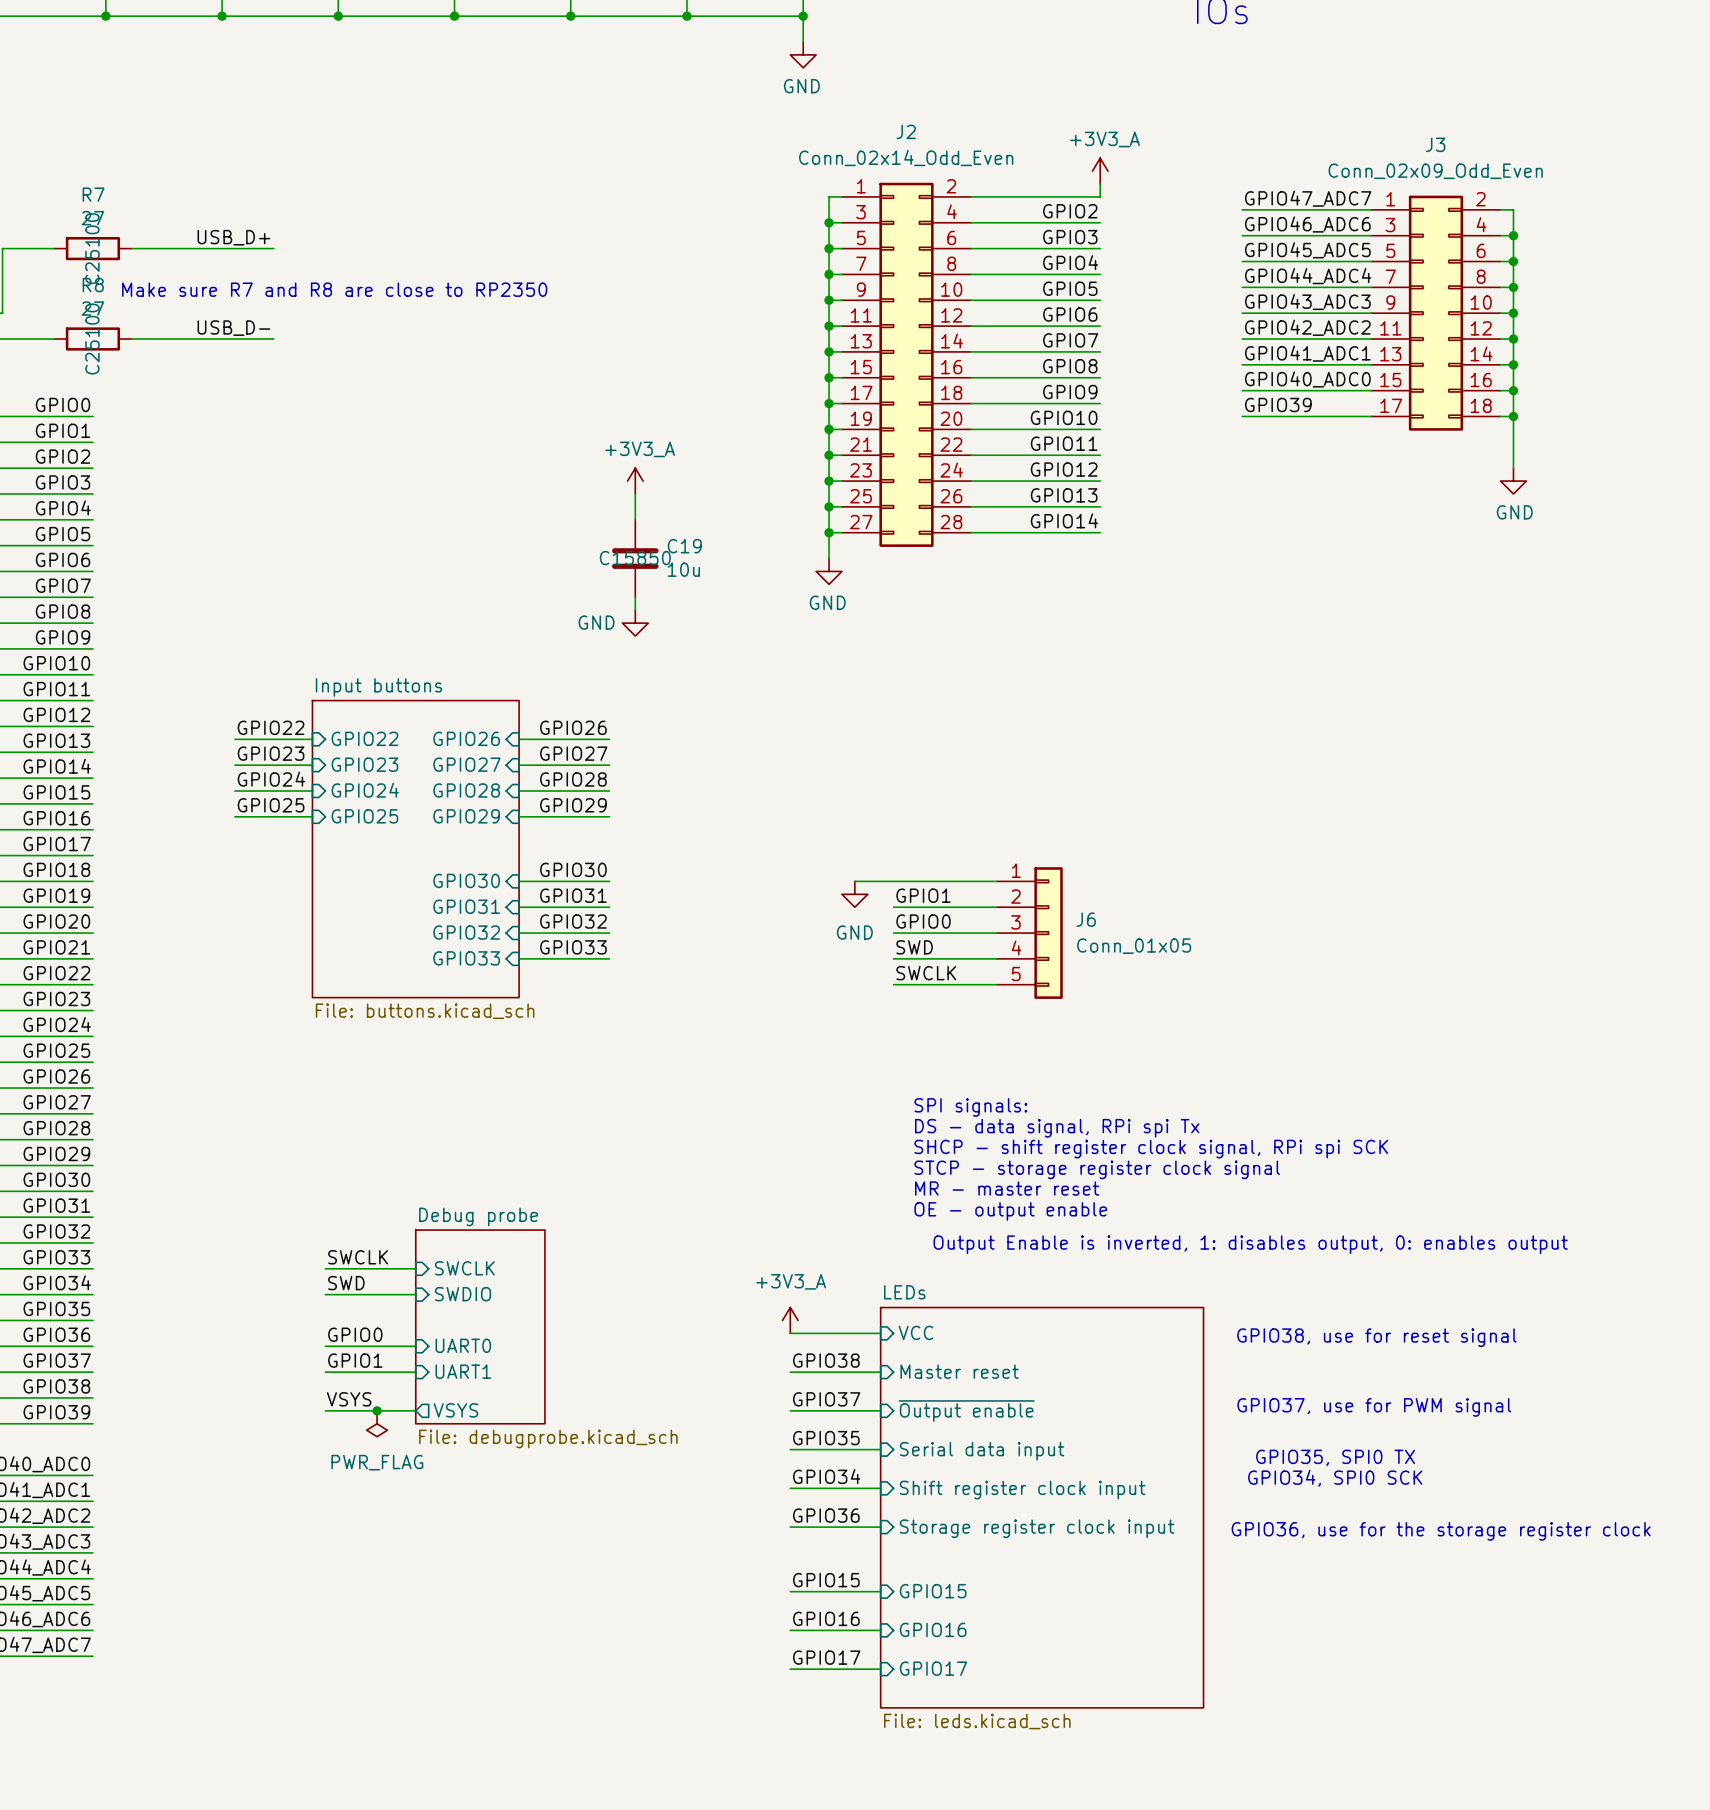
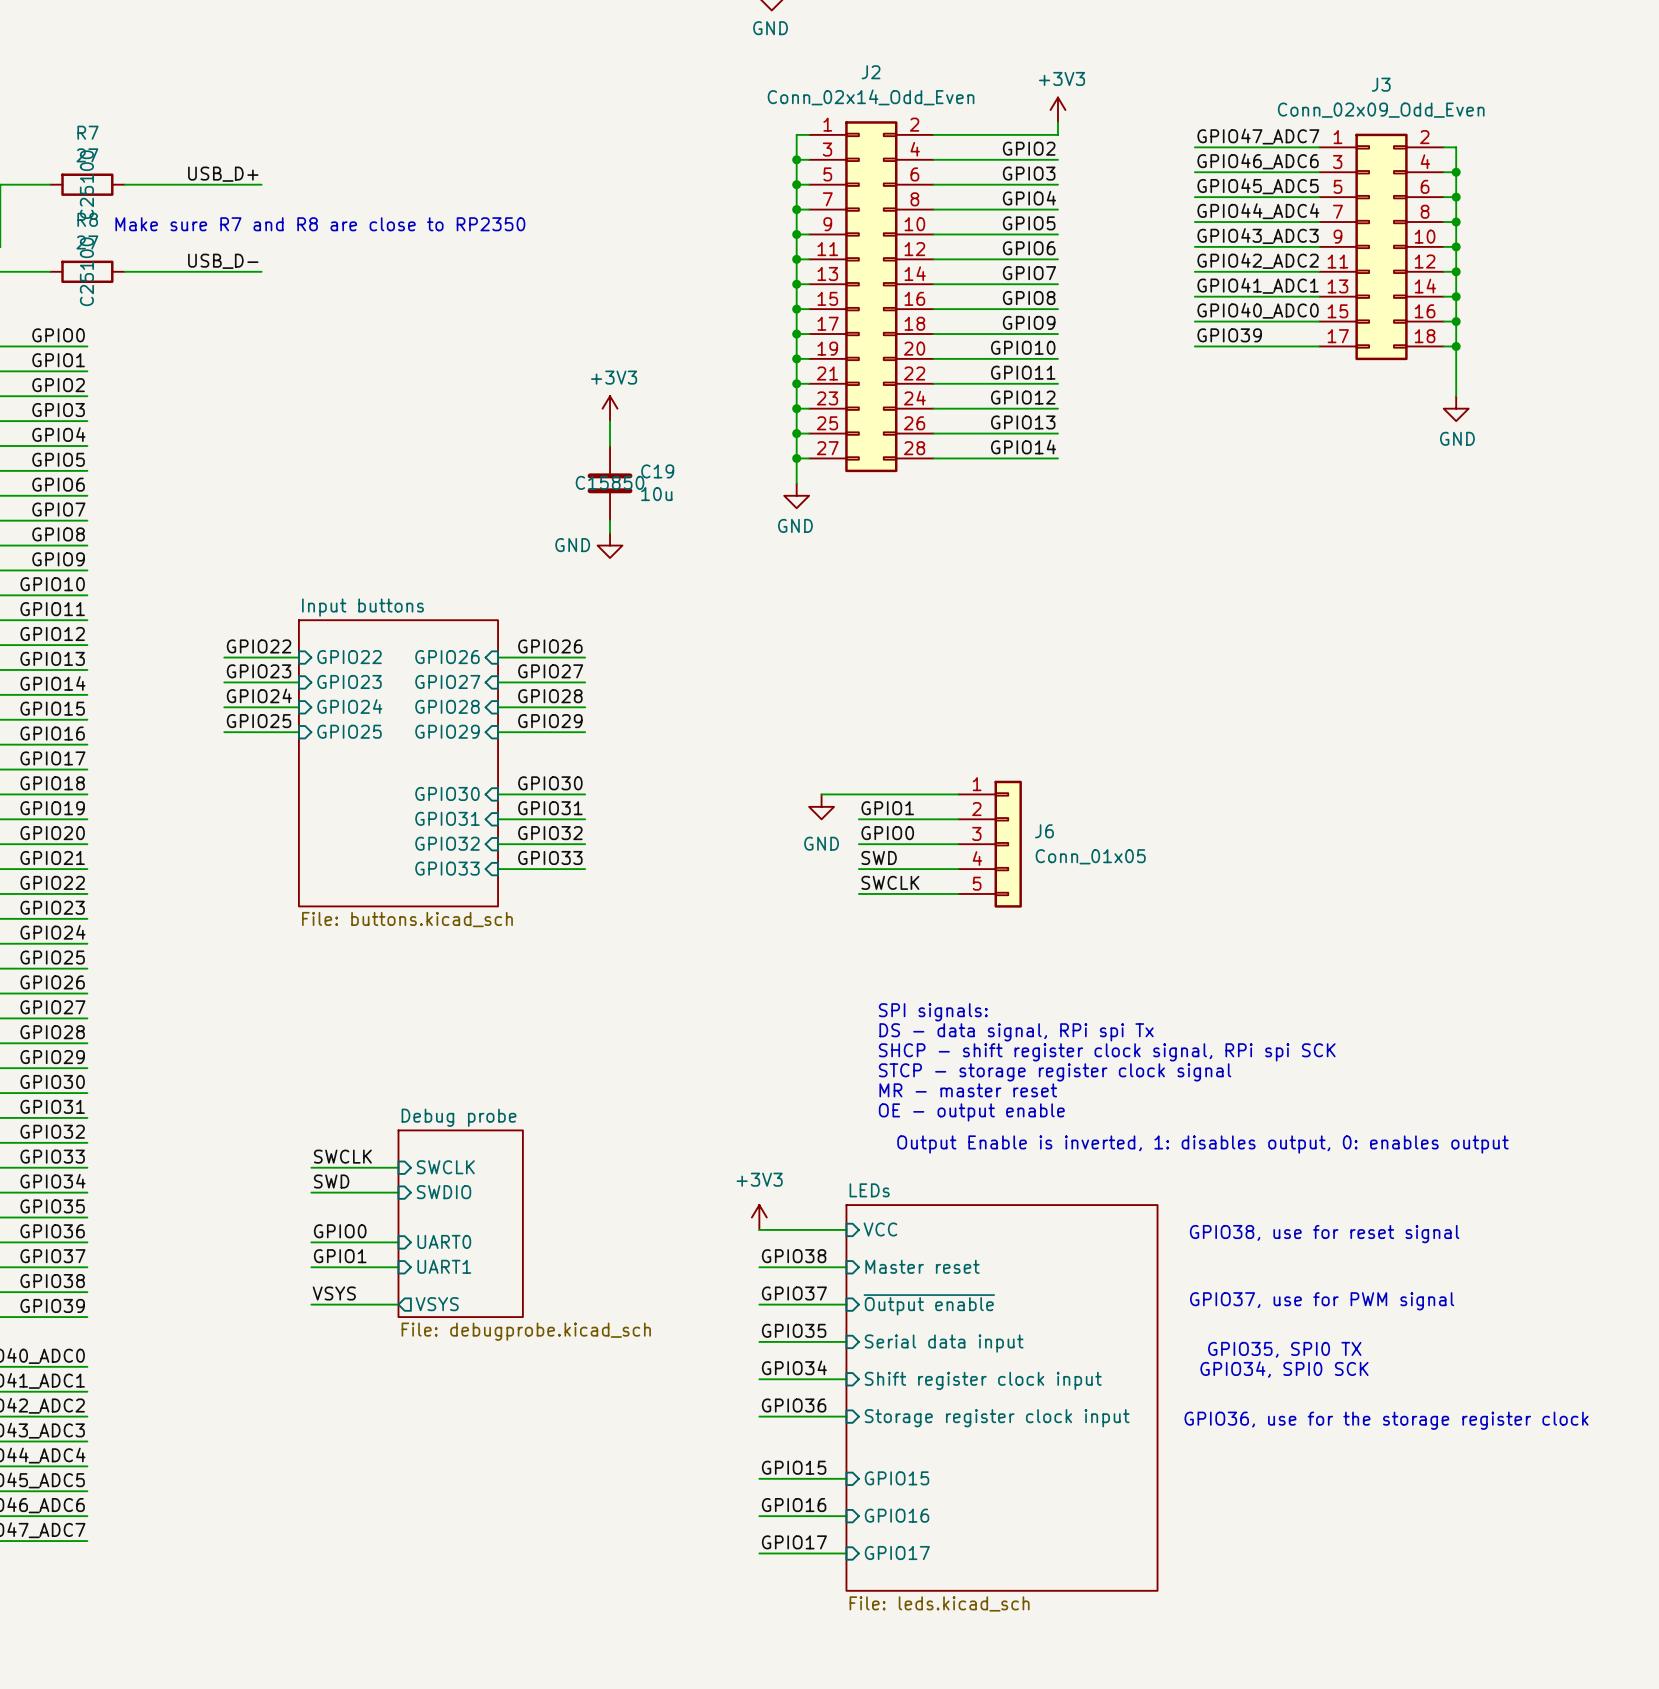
power symbol: +3V3_A (1100, 171) -> +3V3 (1057, 110)
power symbol: +3V3_A (635, 481) -> +3V3 (610, 408)
power symbol: +3V3_A (790, 1320) -> +3V3 (759, 1217)
junction: (377, 1410) -> none
power symbol: PWR_FLAG (377, 1423) -> none

